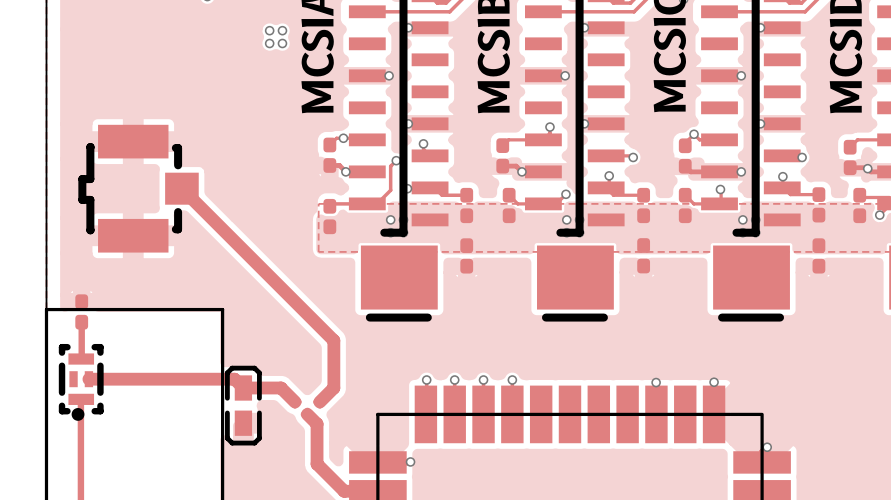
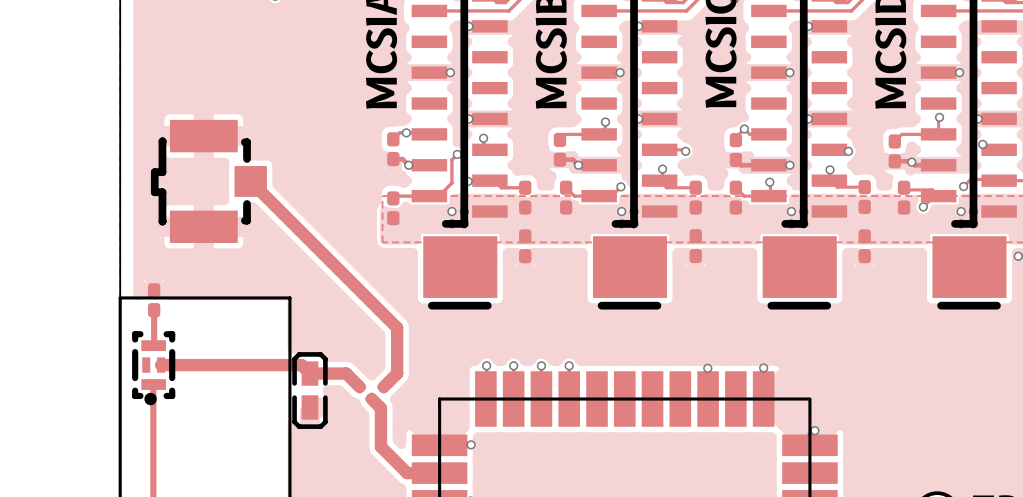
via: (269, 30) -> none
via: (282, 30) -> none
via: (269, 43) -> none
via: (282, 43) -> none

